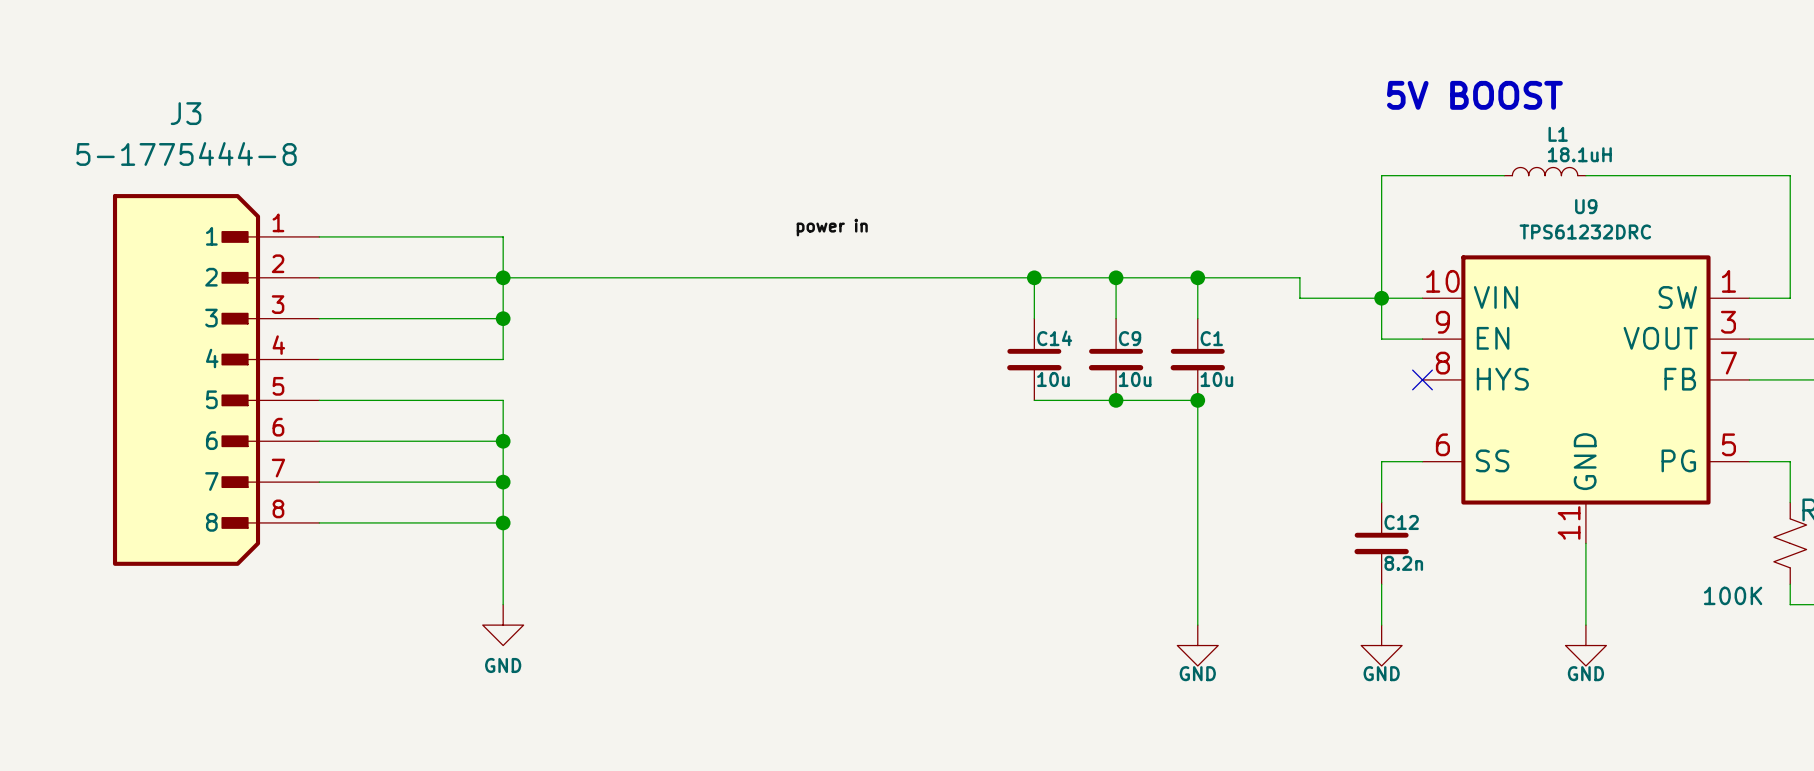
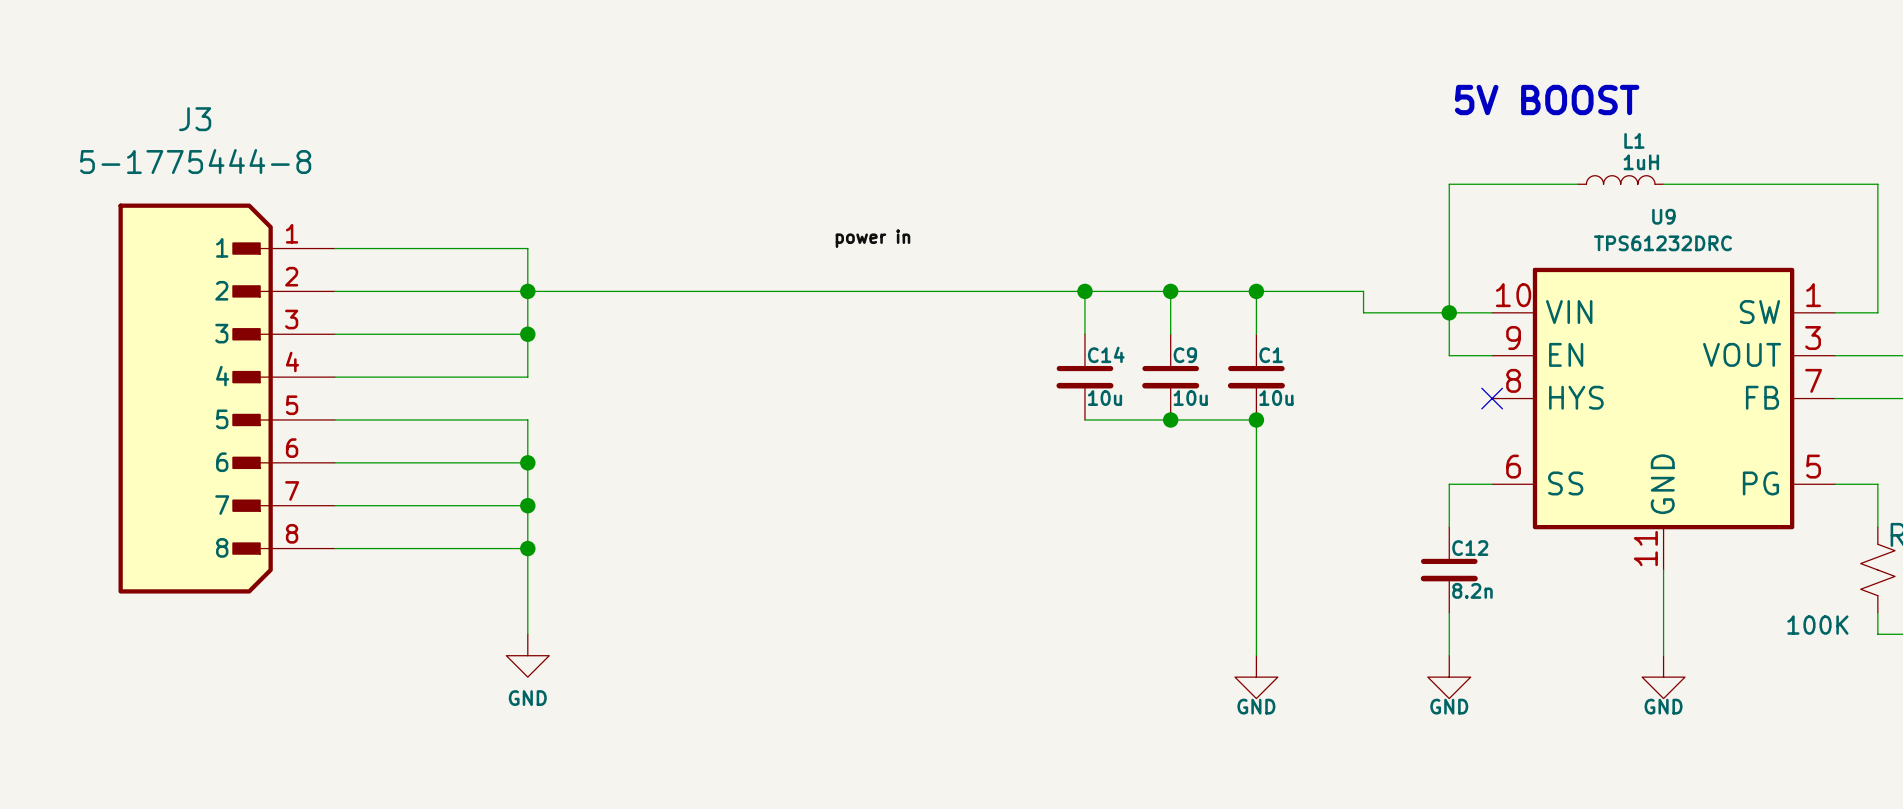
L1 value: 18.1uH (1579, 154) -> 1uH (1641, 162)

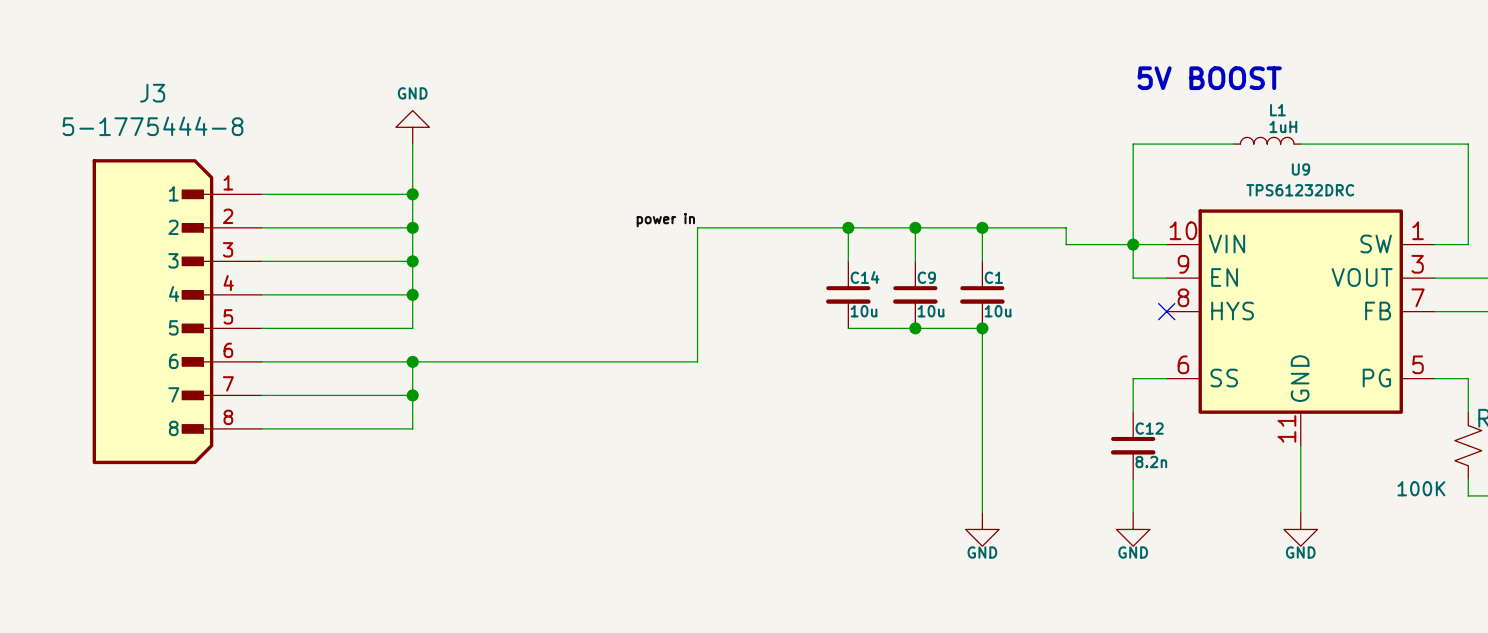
power symbol: none -> GND (412, 127)
wire: none -> (412, 144) (412, 194)
label position: power in (872, 238) -> power in (665, 220)
junction: none -> (412, 194)
wire: (527, 291) (892, 291) -> (412, 361) (697, 361) (697, 227)
junction: none -> (412, 294)
wire: (527, 419) (527, 462) -> (412, 328) (412, 294)
wire: (527, 548) (527, 634) -> none
junction: (527, 548) -> none
power symbol: GND (527, 655) -> none

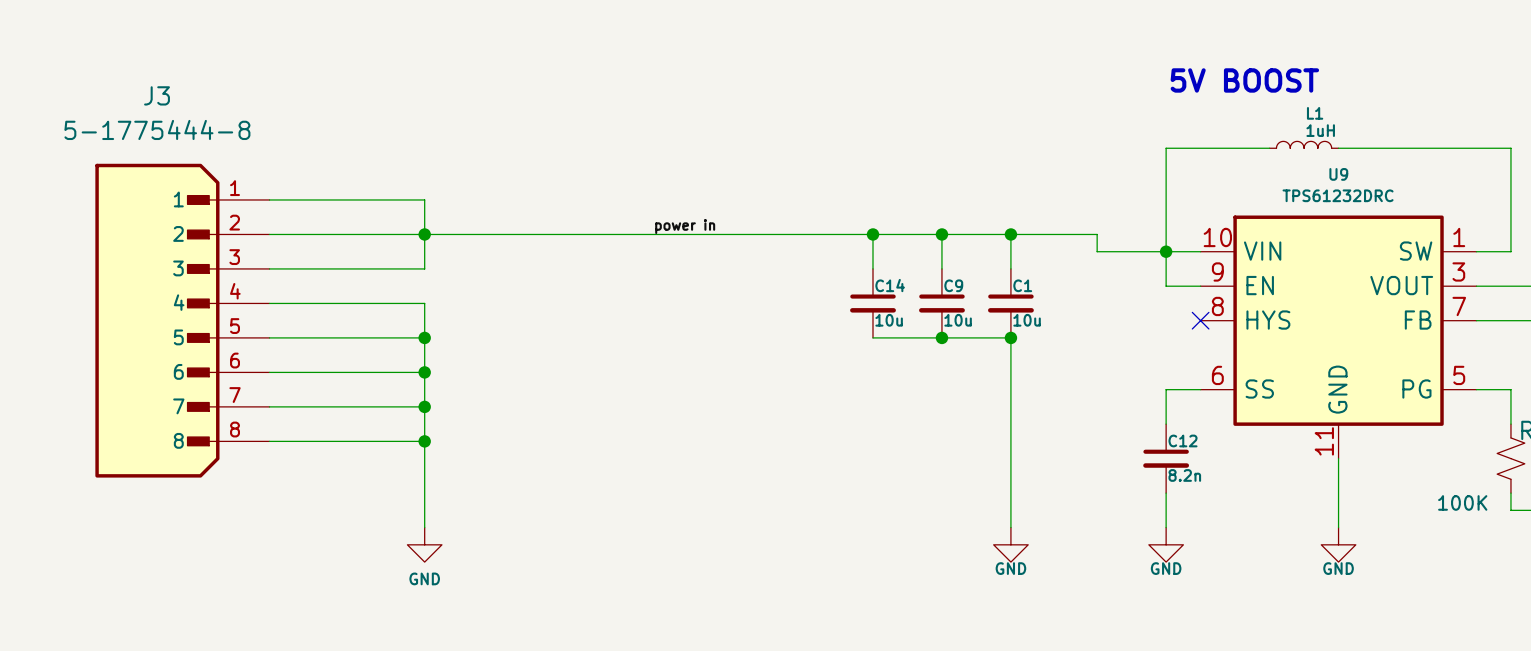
power symbol: GND (412, 127) -> none
wire: (412, 144) (412, 194) -> none
junction: (412, 194) -> none
wire: (697, 227) (697, 361) (412, 361) -> (717, 234) (424, 234)
wire: (412, 261) (412, 294) -> (424, 337) (424, 372)
junction: (412, 261) -> none
junction: (412, 294) -> none
junction: none -> (424, 337)
wire: none -> (424, 441) (424, 527)
junction: none -> (424, 441)
power symbol: none -> GND (424, 544)

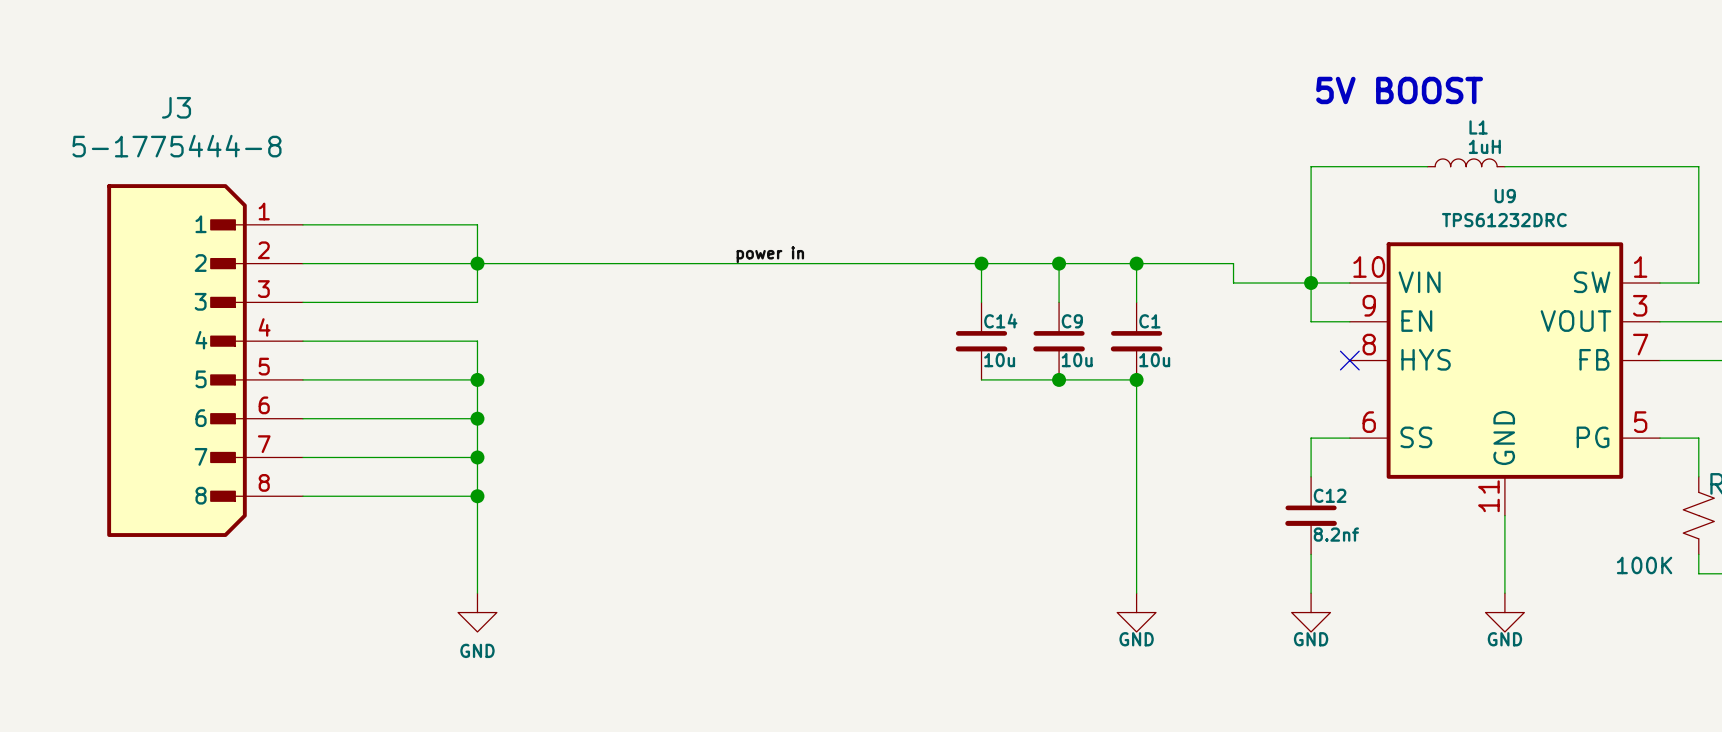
C12 value: 8.2n (1184, 475) -> 8.2nf (1336, 534)

